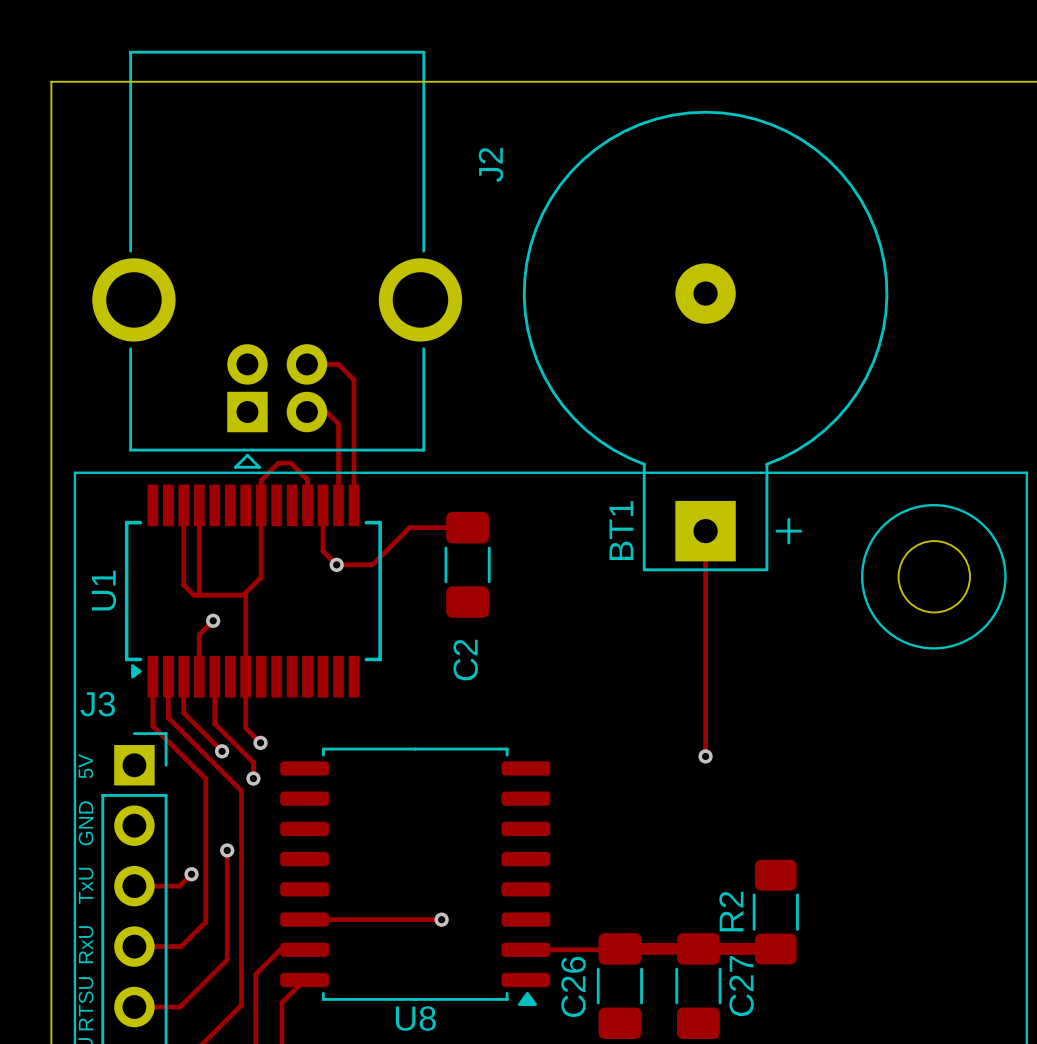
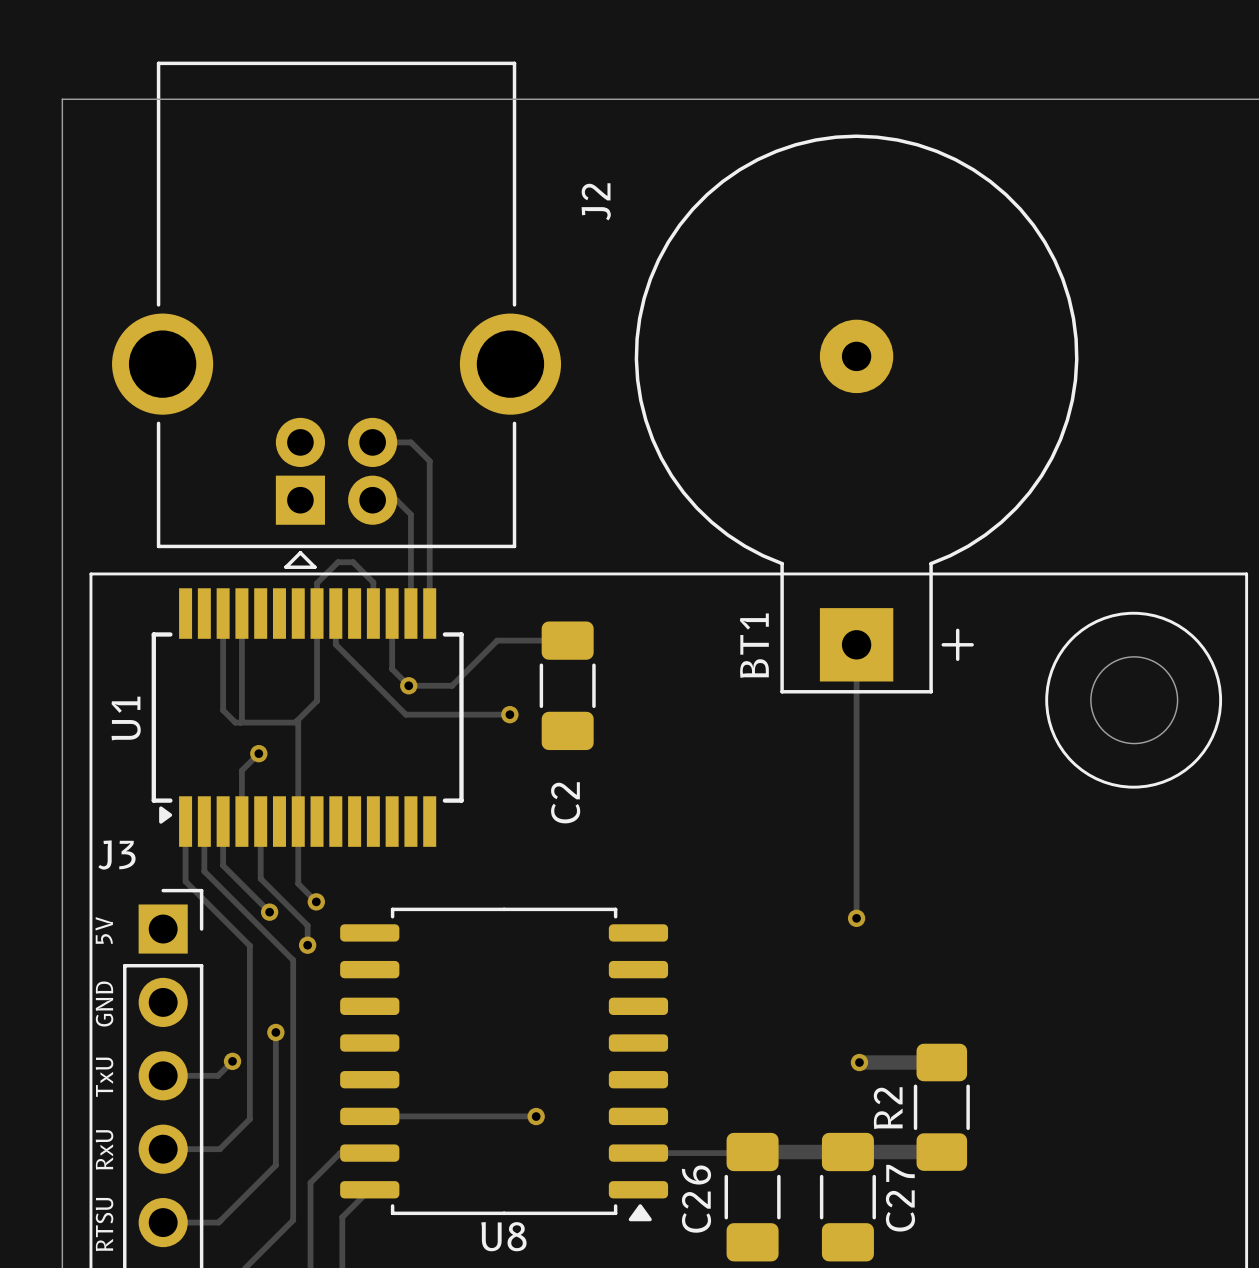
track: none -> (335, 613) (335, 644) (405, 714) (509, 714)
via: none -> (509, 714)
track: none -> (859, 1062) (941, 1062)
via: none -> (859, 1062)

